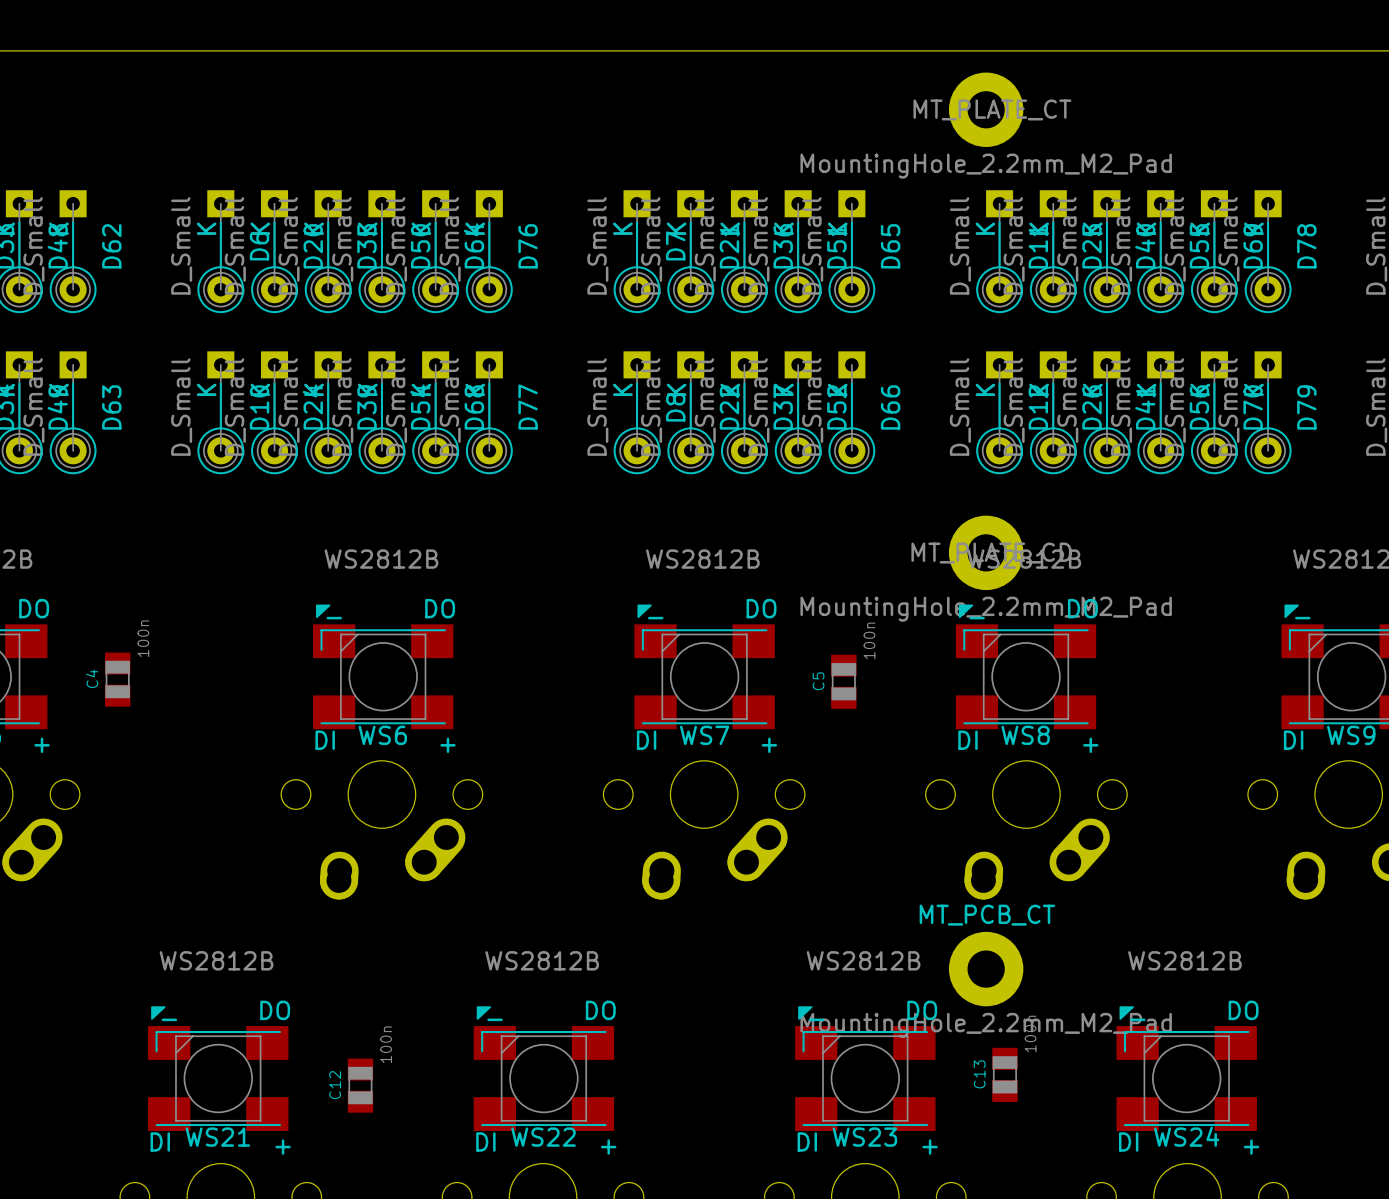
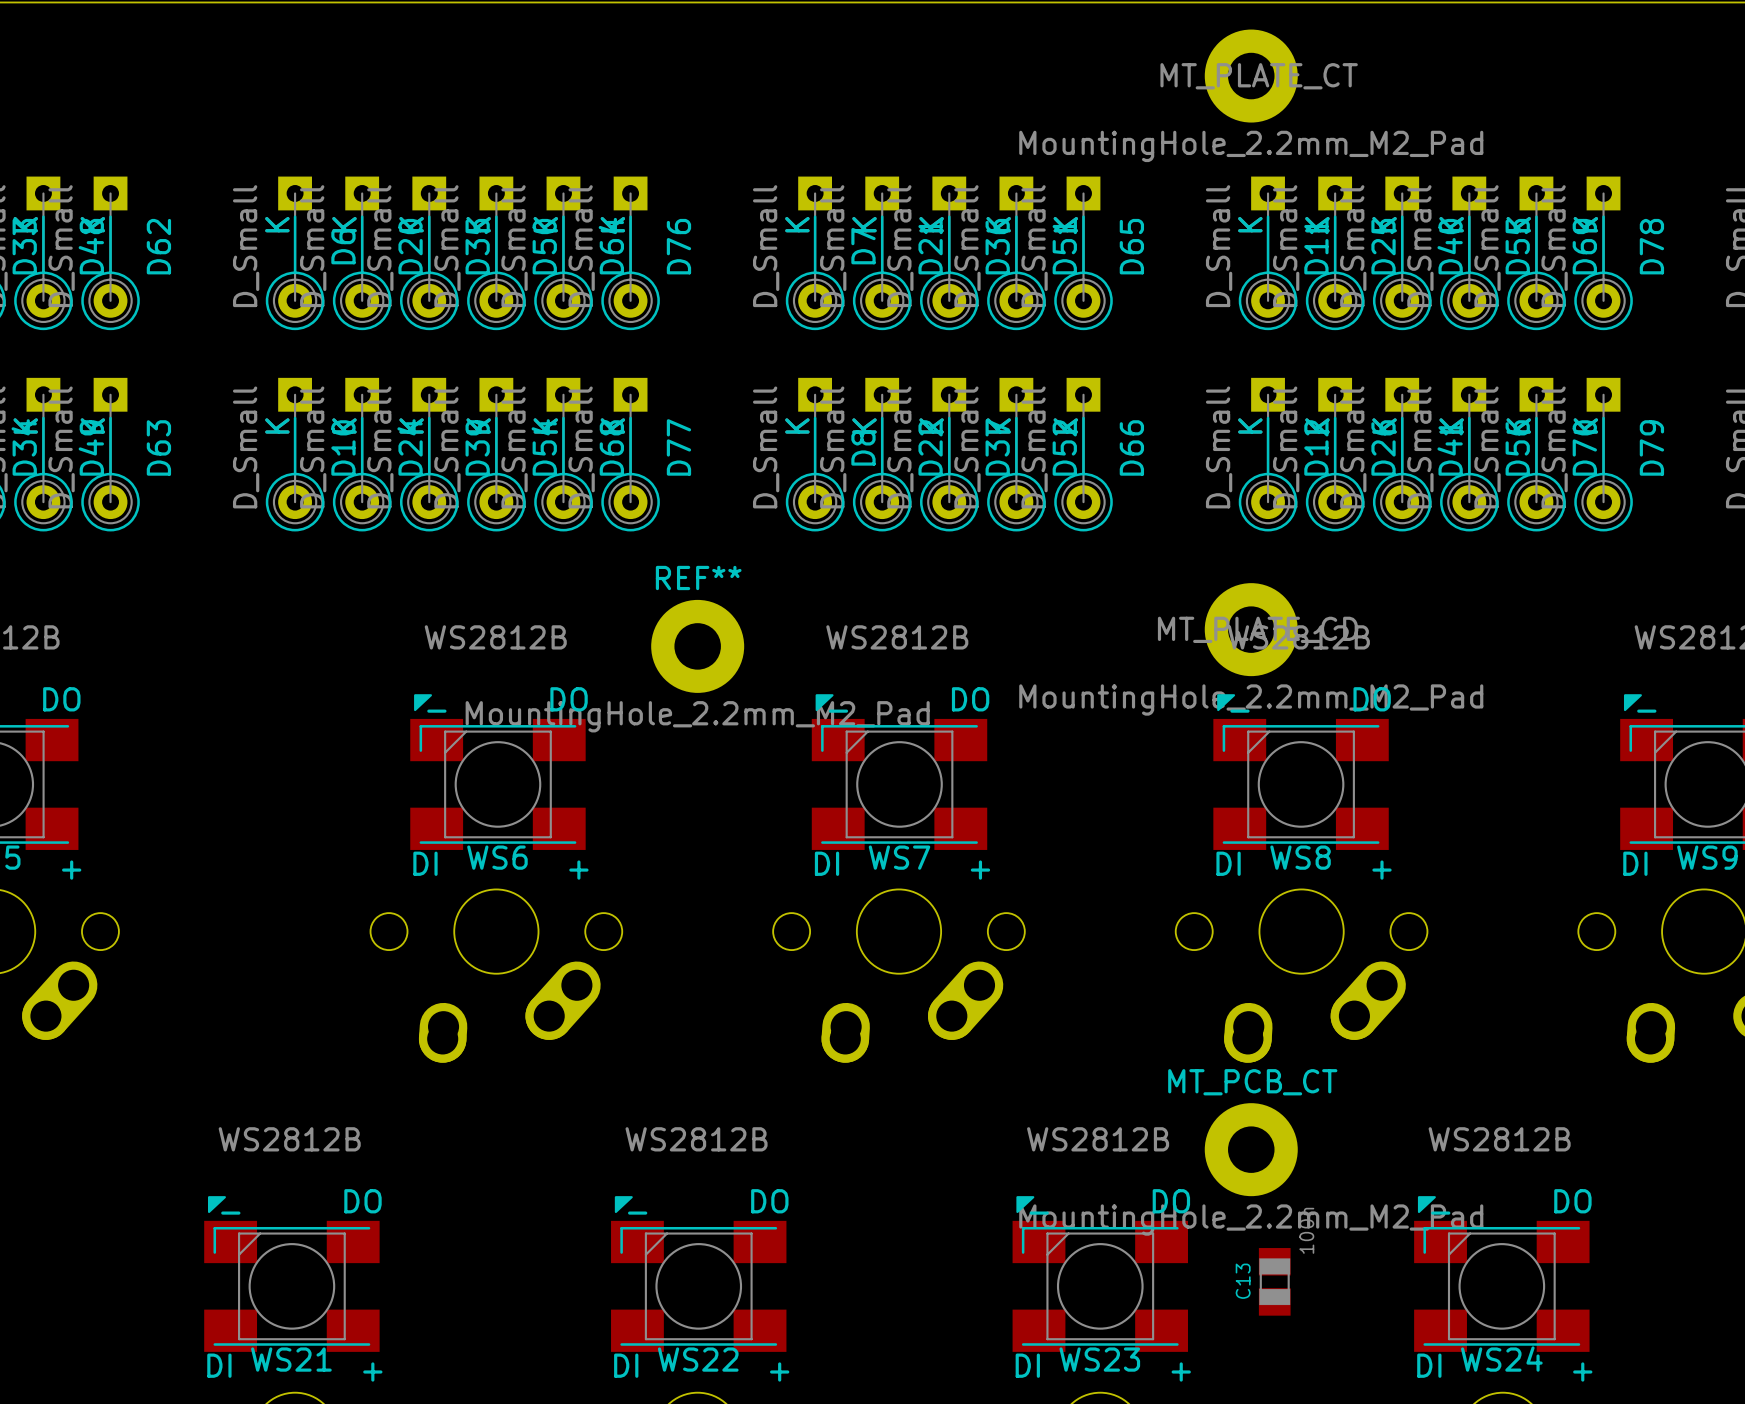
REF**: none -> MountingHole_2.2mm_M2_Pad (697, 646)
C4: 100n (117, 679) -> none
C5: 100n (843, 681) -> none
C12: 100n (360, 1085) -> none

